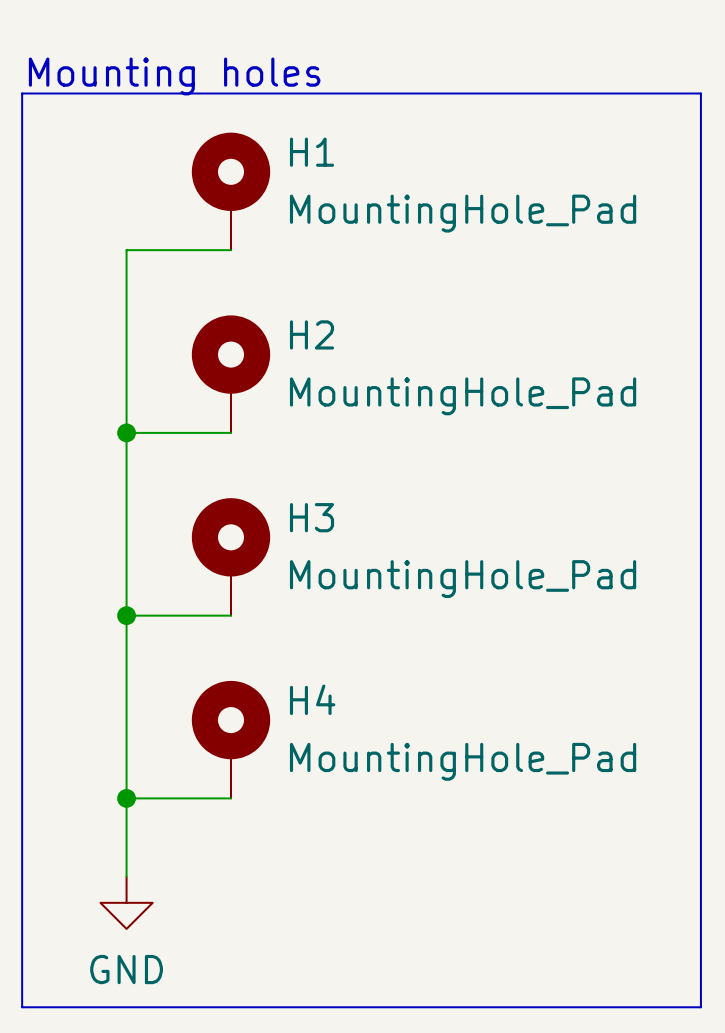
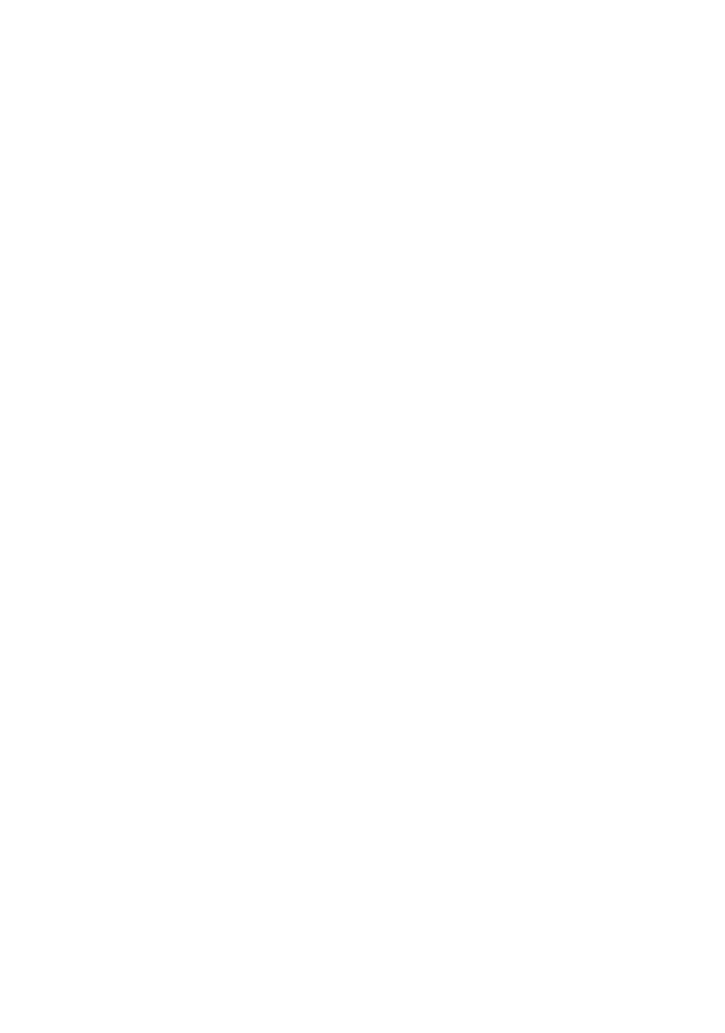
text: Mounting holes (174, 76) -> none
line: (22, 93) (700, 93) (700, 1007) (22, 1007) (22, 93) -> none
H1: MountingHole_Pad (231, 191) -> none
wire: (231, 250) (126, 250) (126, 876) -> none
H2: MountingHole_Pad (231, 374) -> none
wire: (126, 432) (231, 432) -> none
junction: (126, 432) -> none
H3: MountingHole_Pad (231, 556) -> none
wire: (126, 615) (231, 615) -> none
junction: (126, 615) -> none
H4: MountingHole_Pad (231, 739) -> none
wire: (126, 798) (231, 798) -> none
junction: (126, 798) -> none
power symbol: GND (126, 902) -> none

